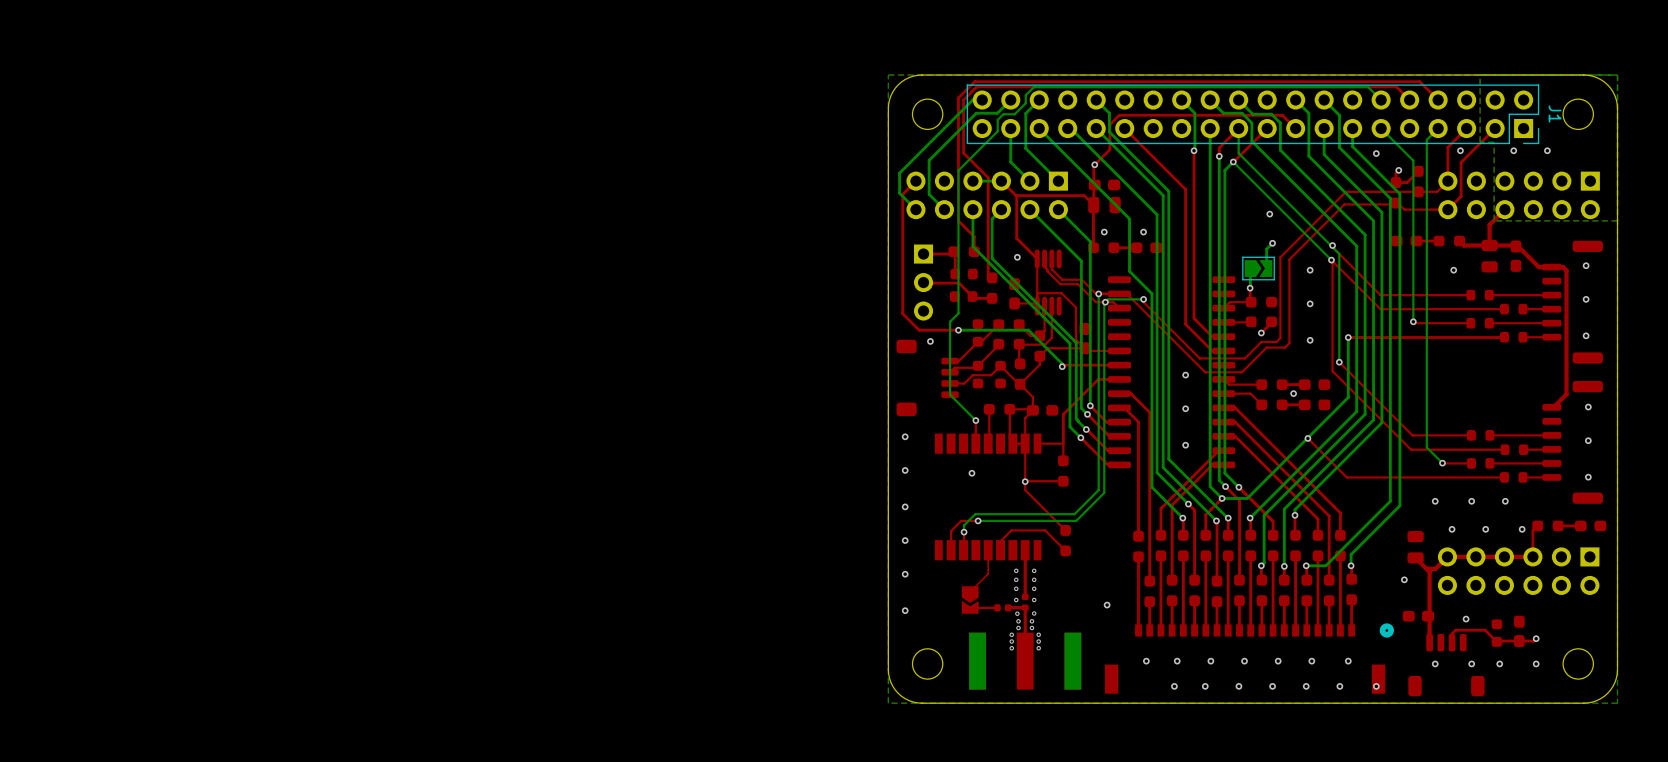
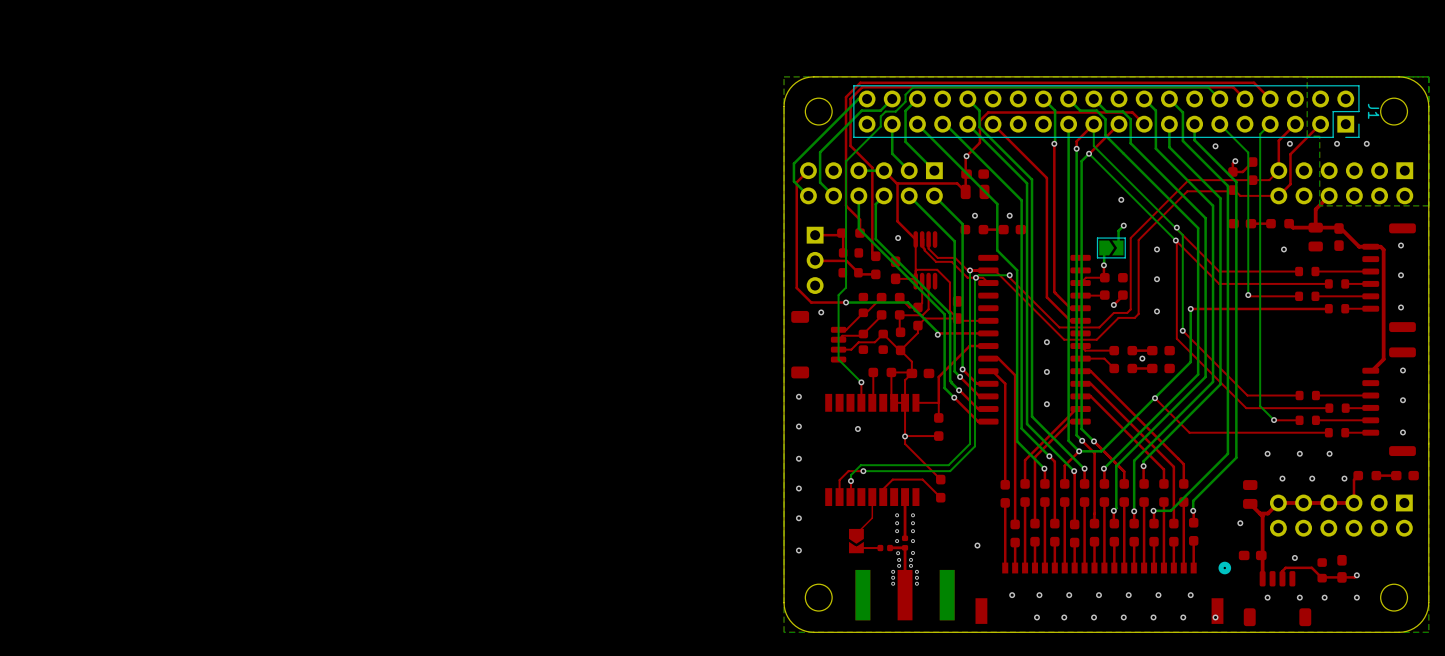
top track: (1093, 205) (1093, 246) -> none

